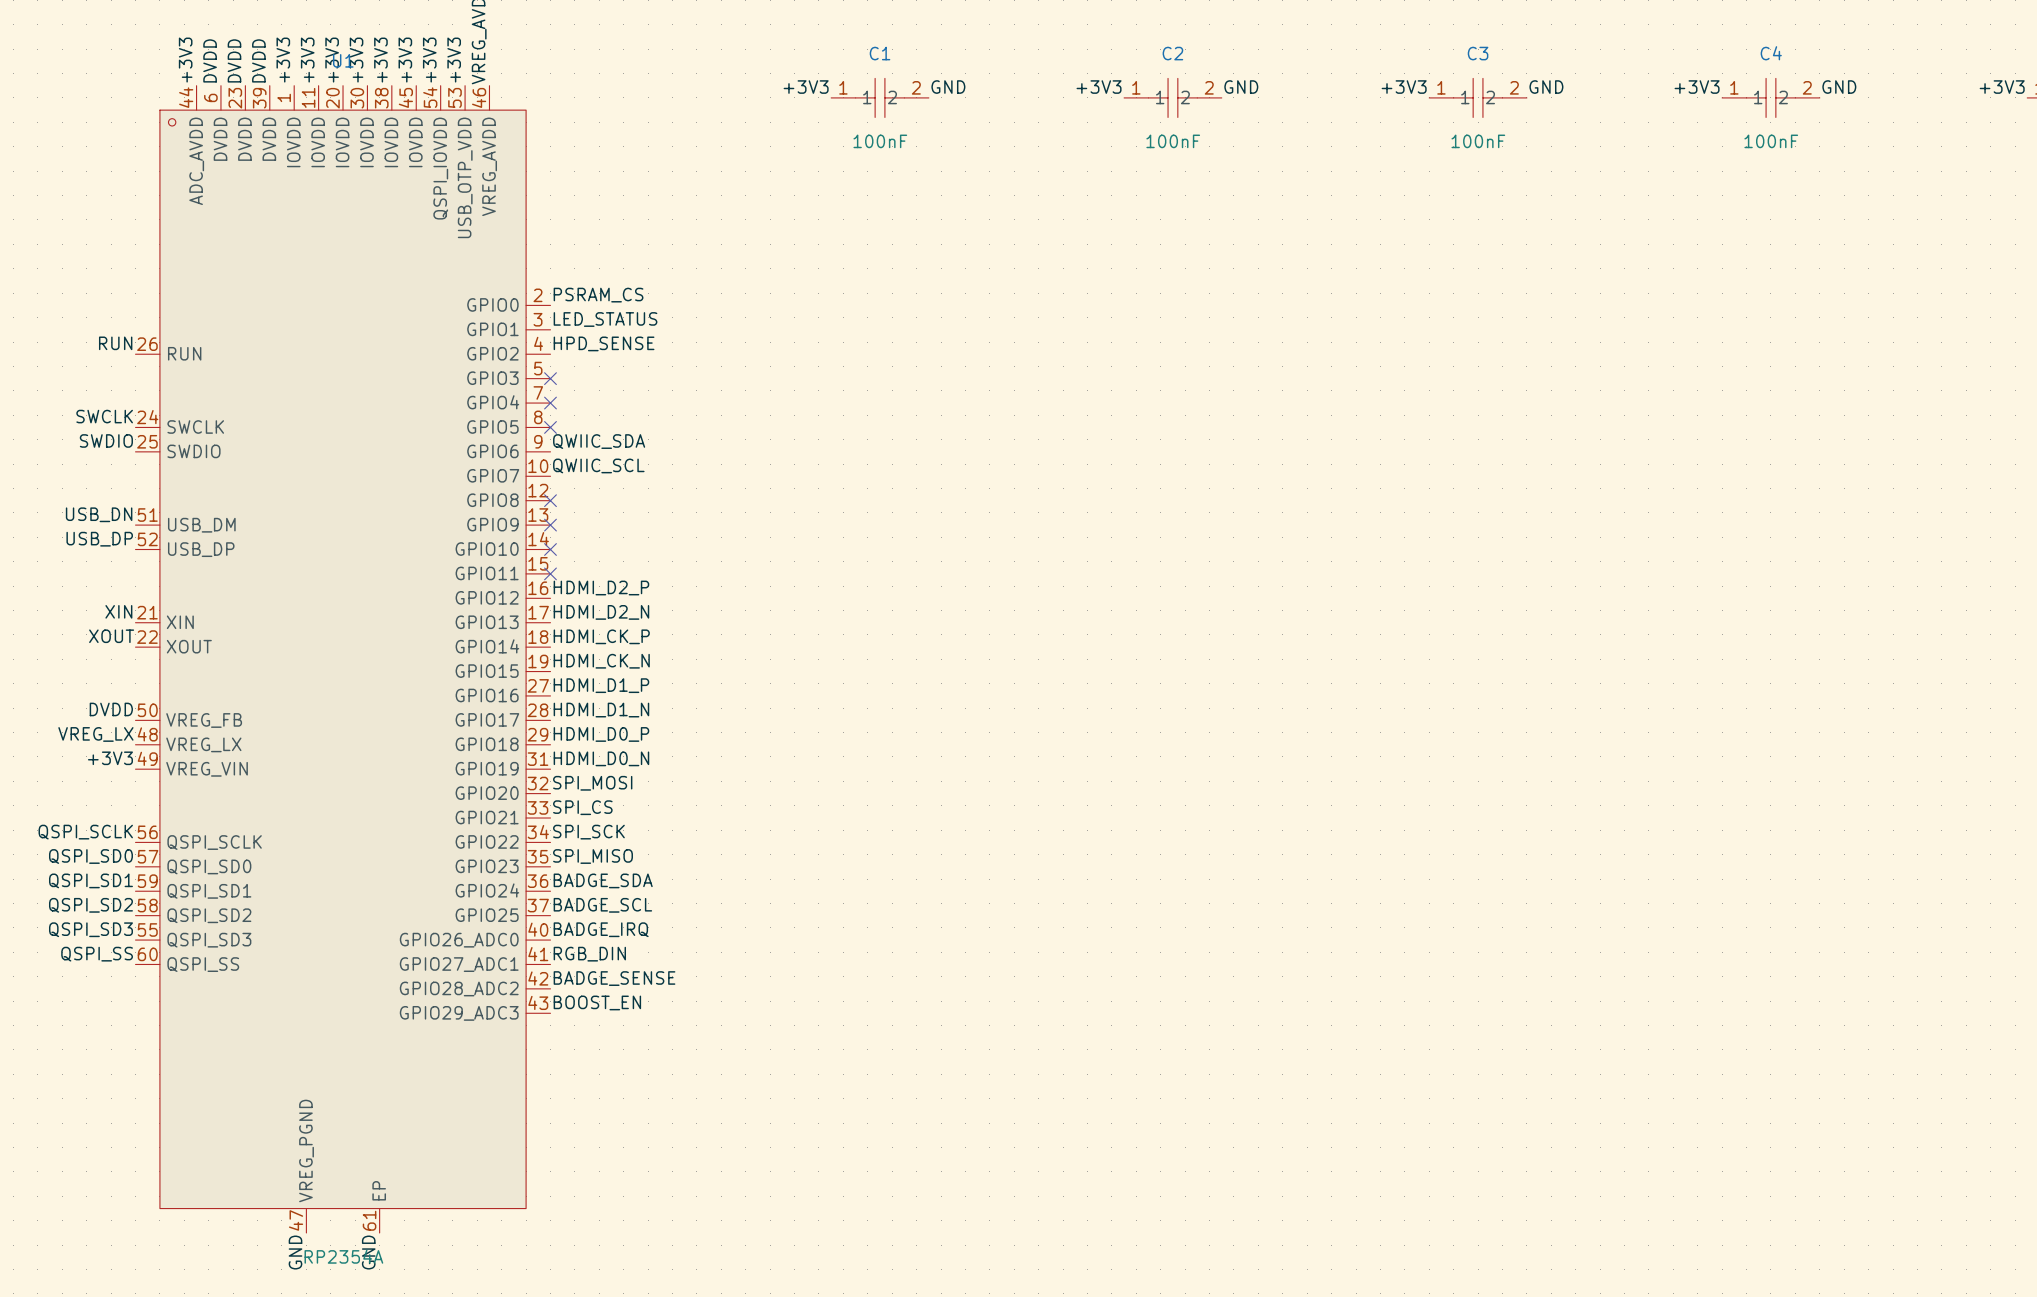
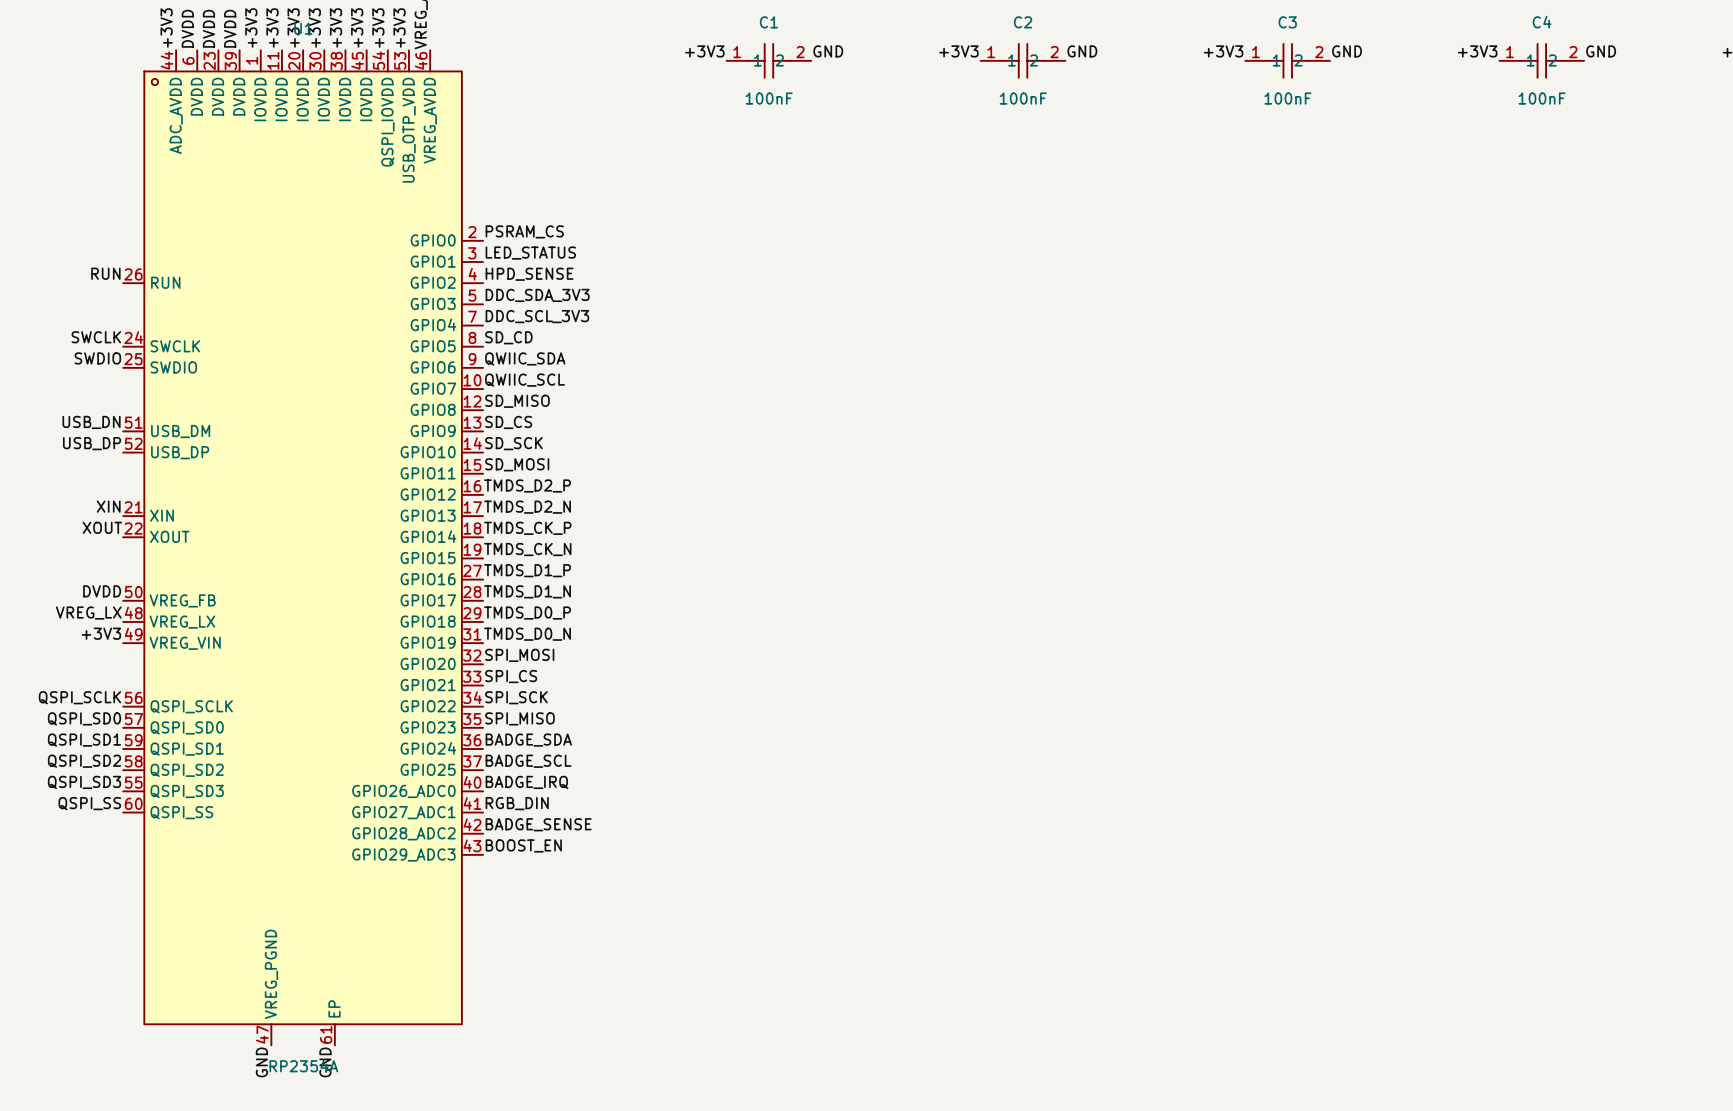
label: none -> DDC_SDA_3V3 (537, 295)
no-connect mark: (550, 378) -> none
label: none -> DDC_SCL_3V3 (537, 316)
no-connect mark: (550, 403) -> none
label: none -> SD_CD (508, 337)
no-connect mark: (550, 427) -> none
label: none -> SD_MISO (517, 401)
no-connect mark: (550, 500) -> none
label: none -> SD_CS (508, 422)
no-connect mark: (550, 525) -> none
label: none -> SD_SCK (513, 443)
no-connect mark: (550, 549) -> none
label: none -> SD_MOSI (517, 464)
no-connect mark: (550, 573) -> none
label: HDMI_D2_P (601, 588) -> TMDS_D2_P (527, 485)
label: HDMI_D2_N (601, 612) -> TMDS_D2_N (527, 507)
label: HDMI_CK_P (601, 636) -> TMDS_CK_P (527, 528)
label: HDMI_CK_N (601, 661) -> TMDS_CK_N (527, 549)
label: HDMI_D1_P (601, 685) -> TMDS_D1_P (527, 570)
label: HDMI_D1_N (601, 710) -> TMDS_D1_N (527, 591)
label: HDMI_D0_P (601, 734) -> TMDS_D0_P (527, 613)
label: HDMI_D0_N (601, 758) -> TMDS_D0_N (527, 634)

